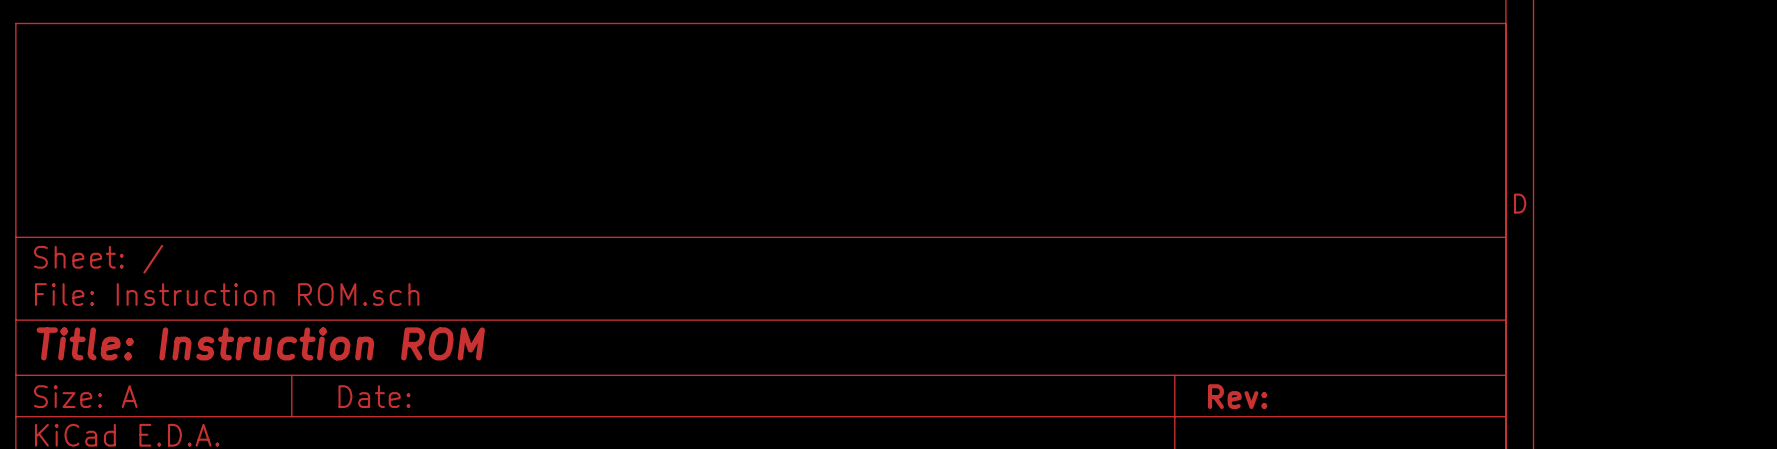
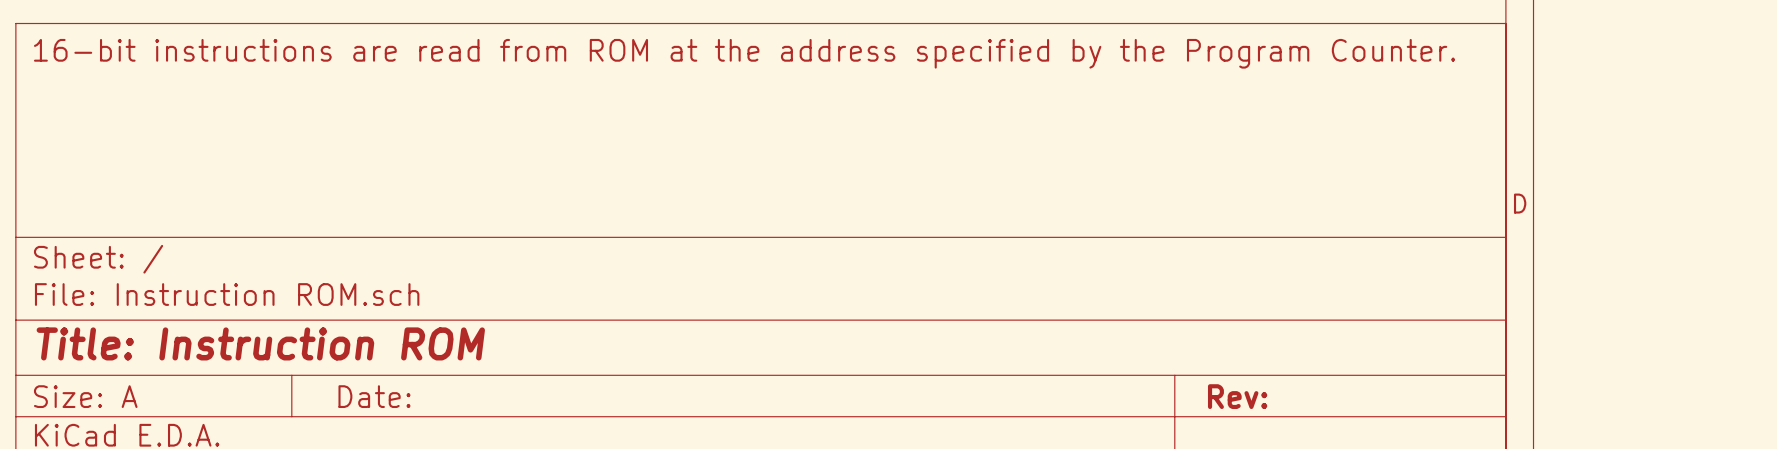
title block: none -> 16-bit instructions are read from ROM at the address specified by the Program Counter. (744, 53)

